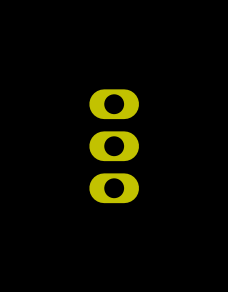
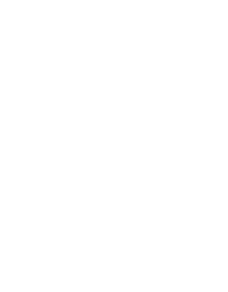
part: (114, 146) -> none

